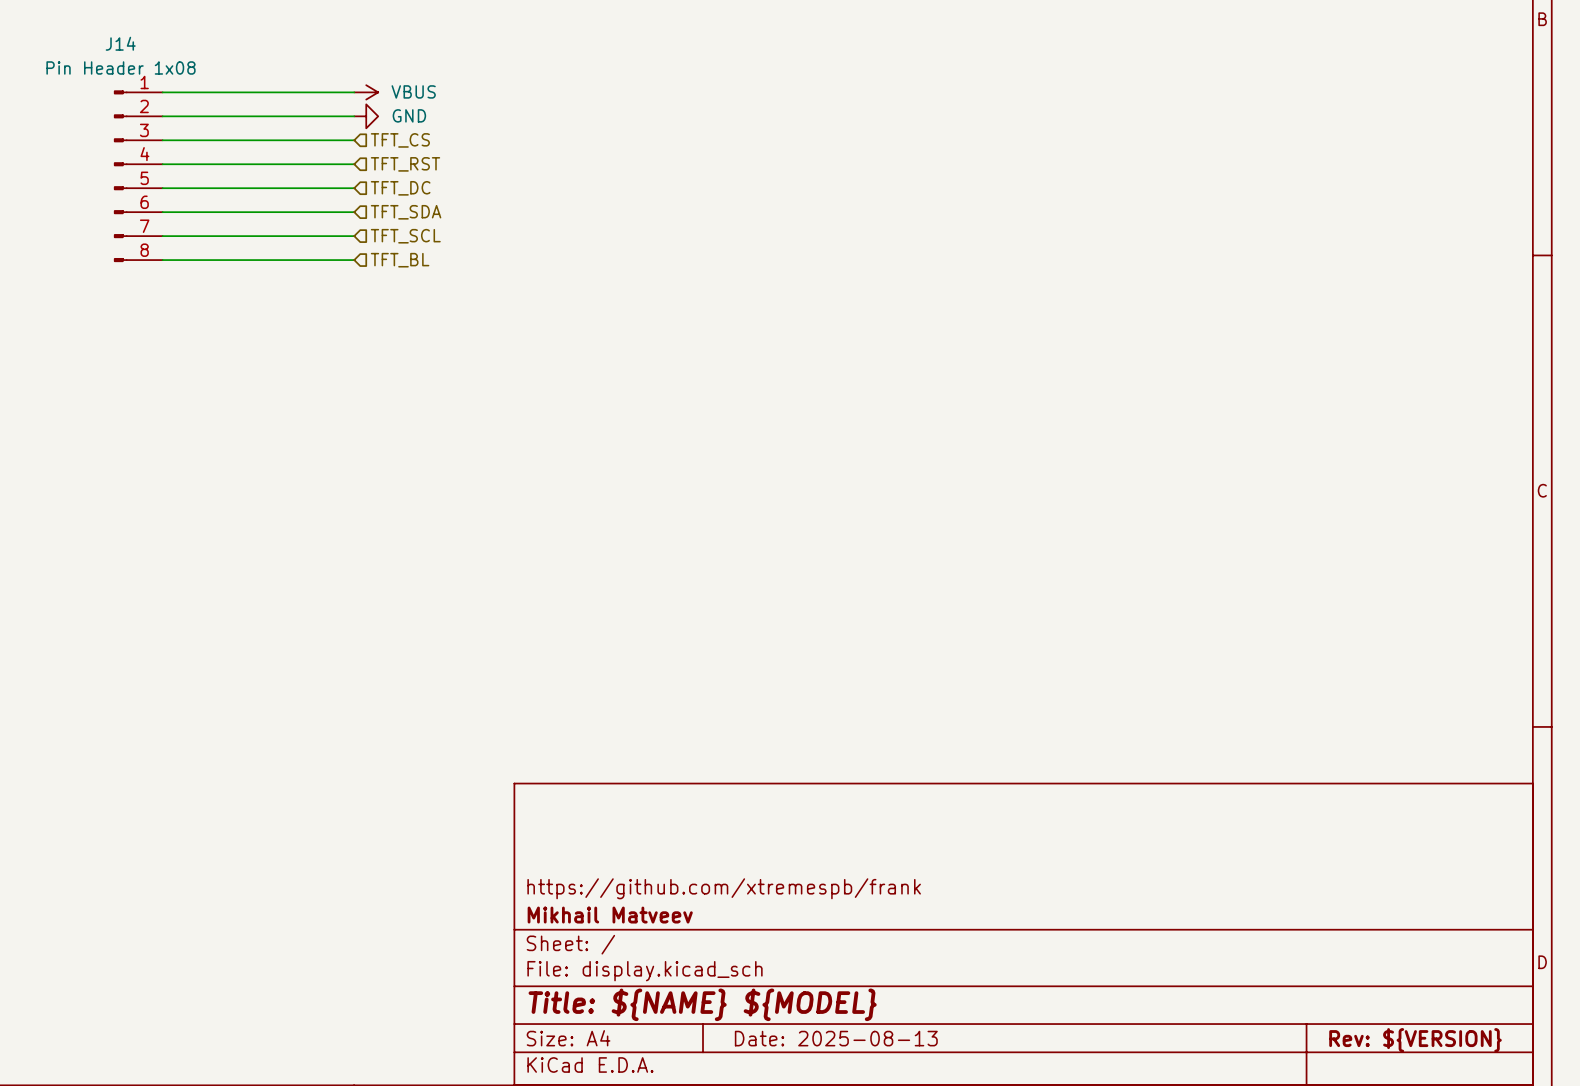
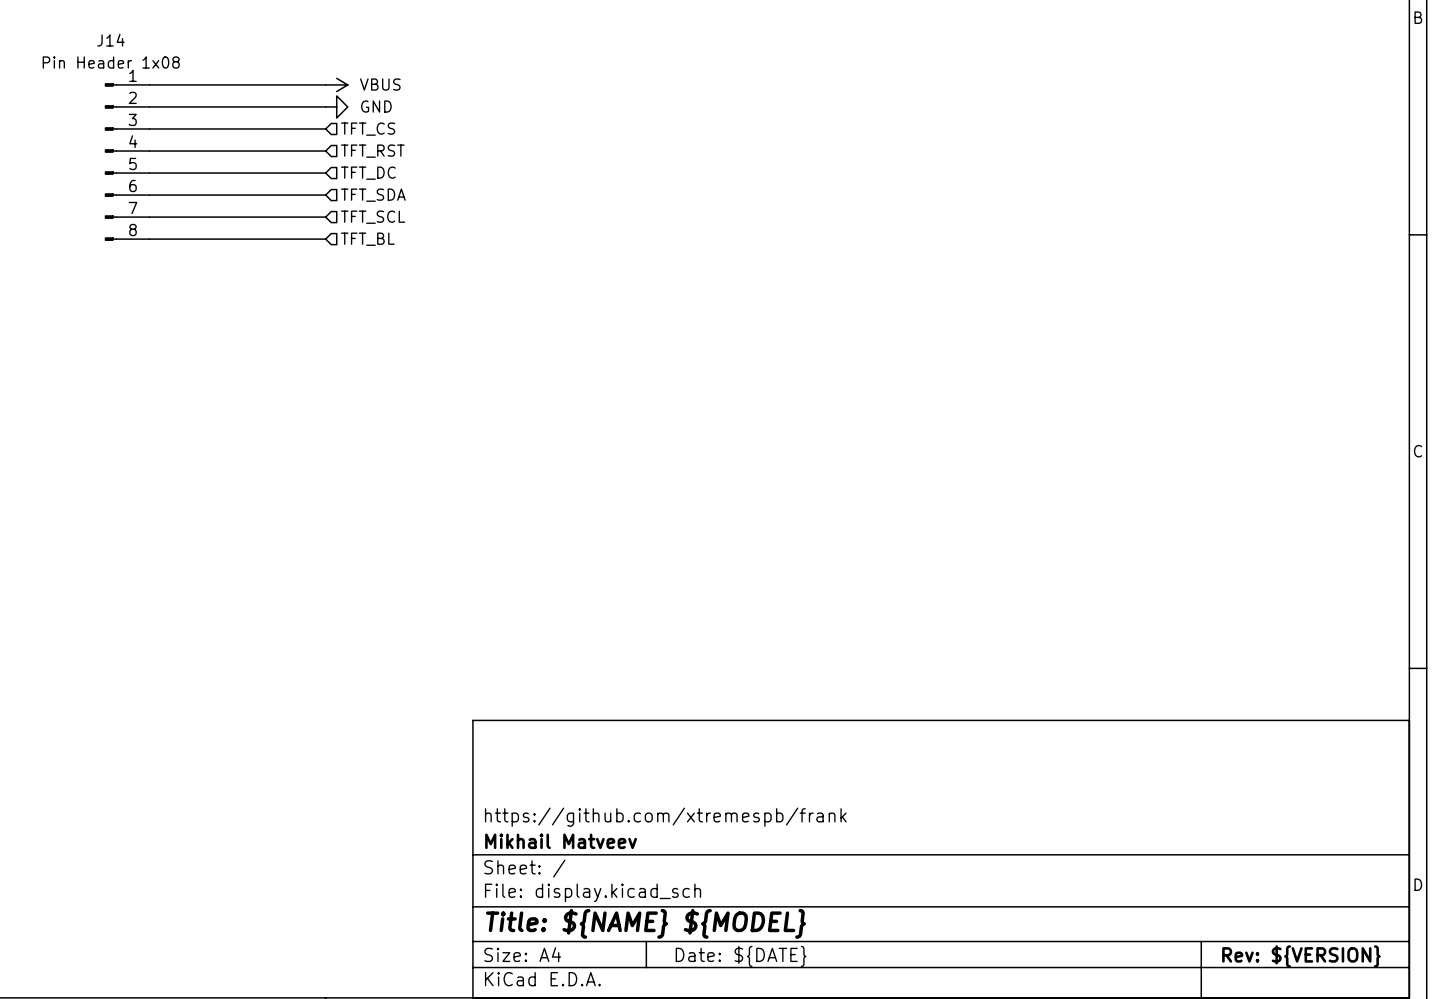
title block: Date: 2025-08-13 (836, 1038) -> Date: ${DATE} (741, 956)

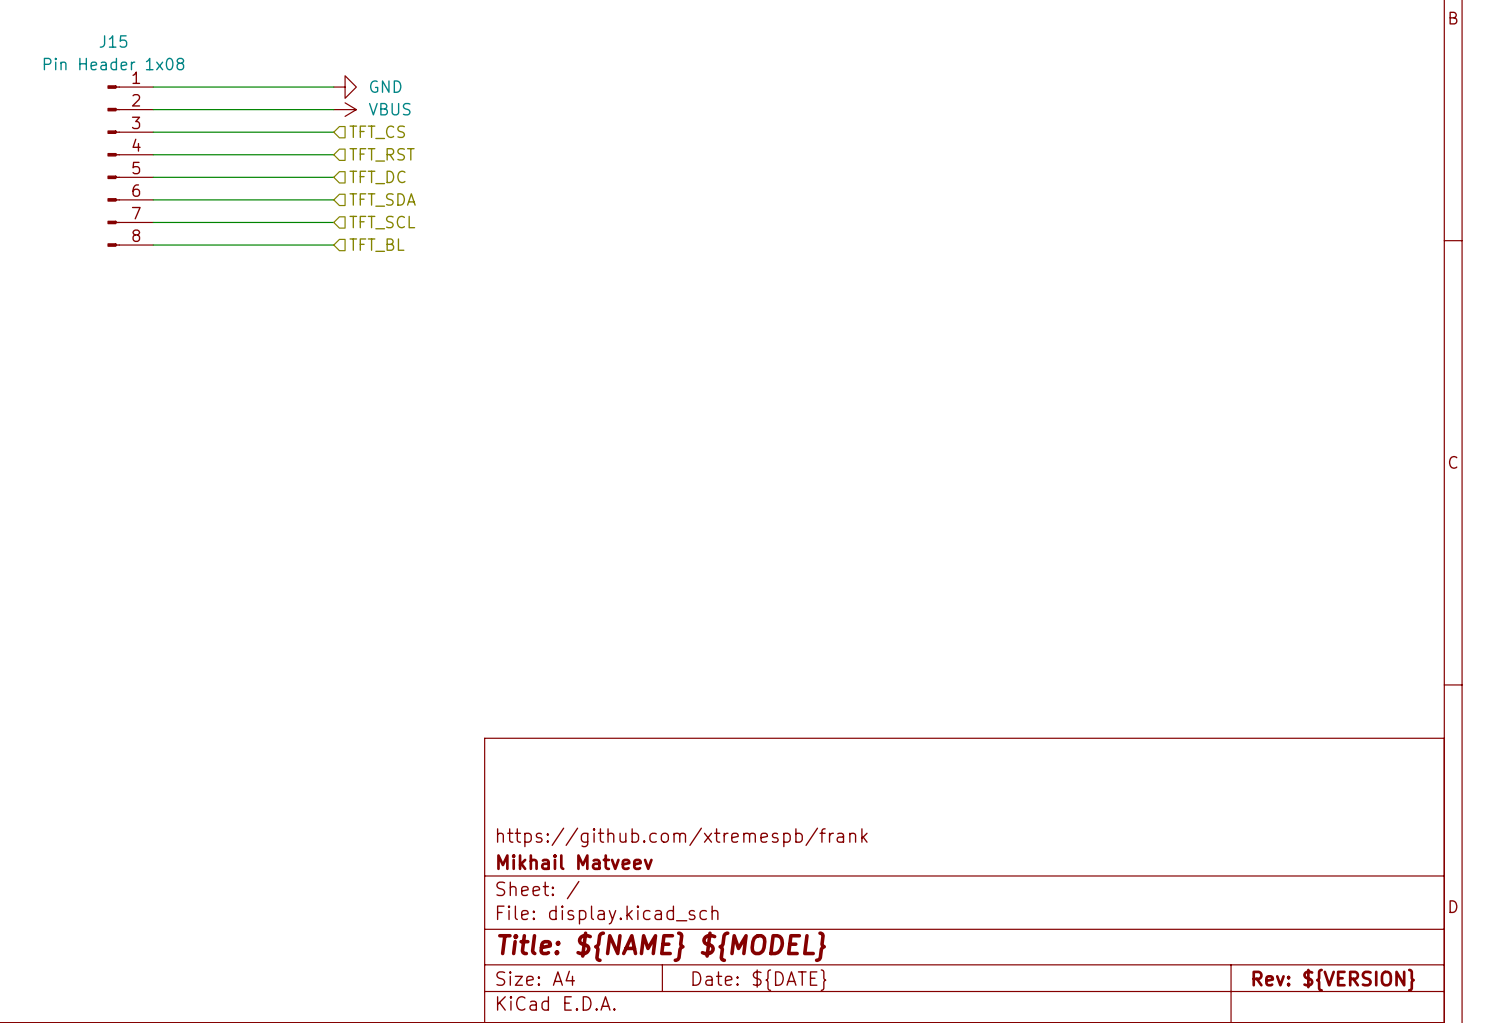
J14 name: J14 (110, 40) -> J15 (113, 41)
power symbol: VBUS (336, 84) -> GND (345, 87)
power symbol: GND (336, 106) -> VBUS (345, 109)

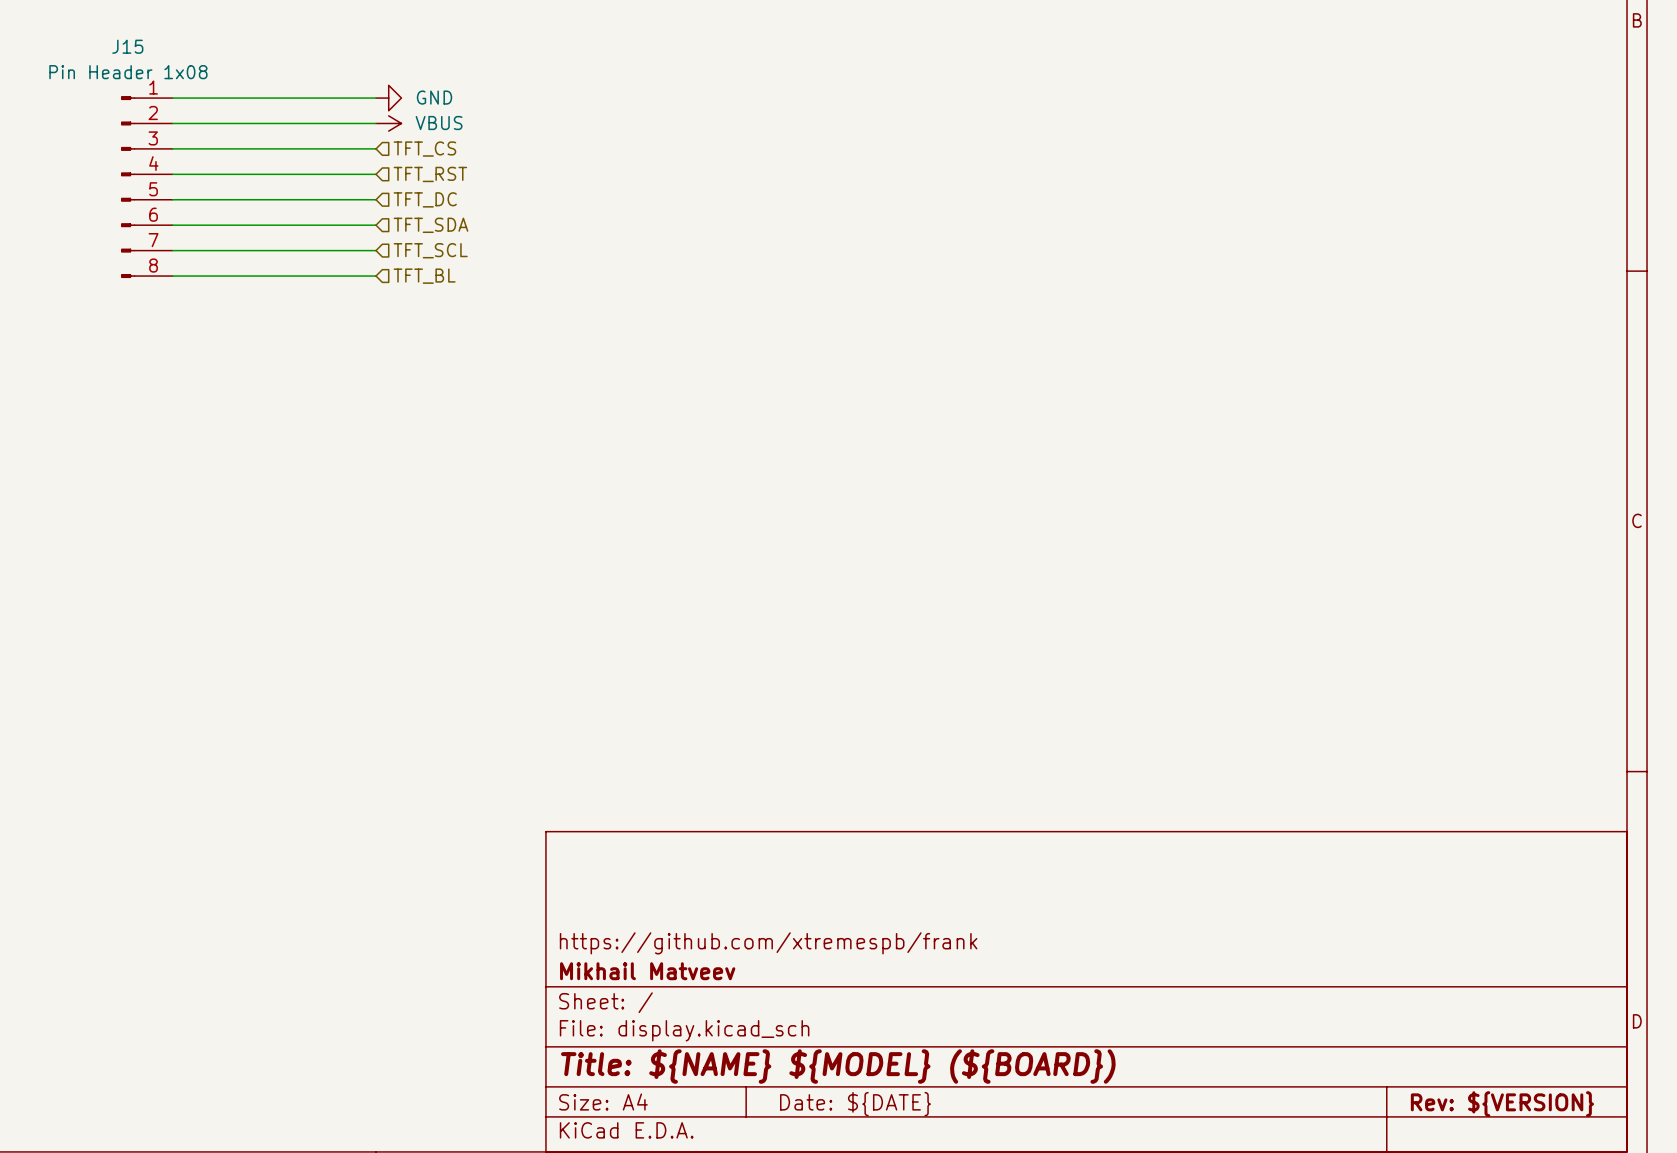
title block: Title: ${NAME} ${MODEL} (662, 946) -> Title: ${NAME} ${MODEL} (${BOARD}) (838, 1066)

